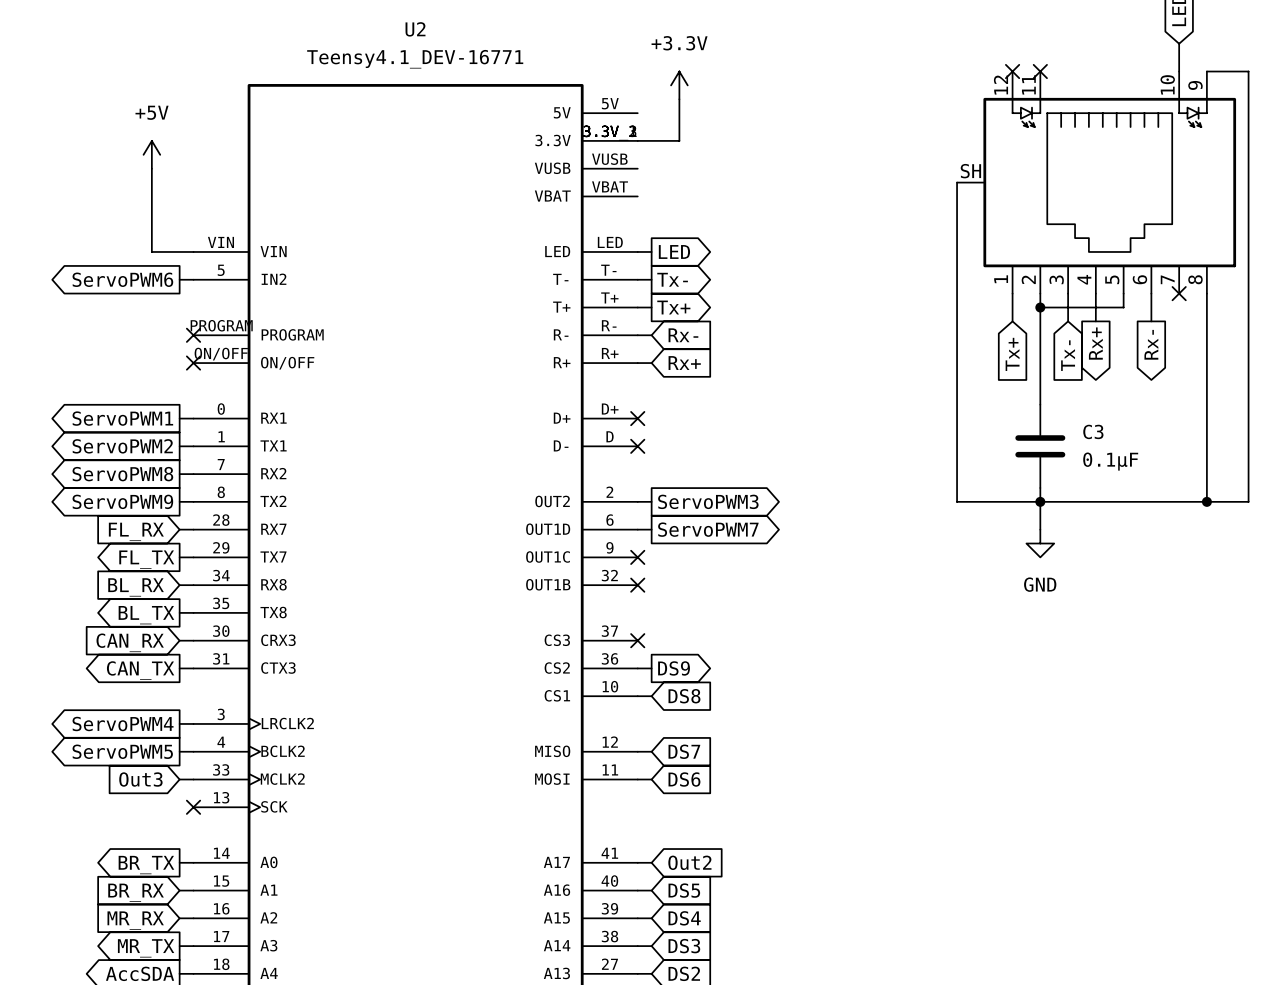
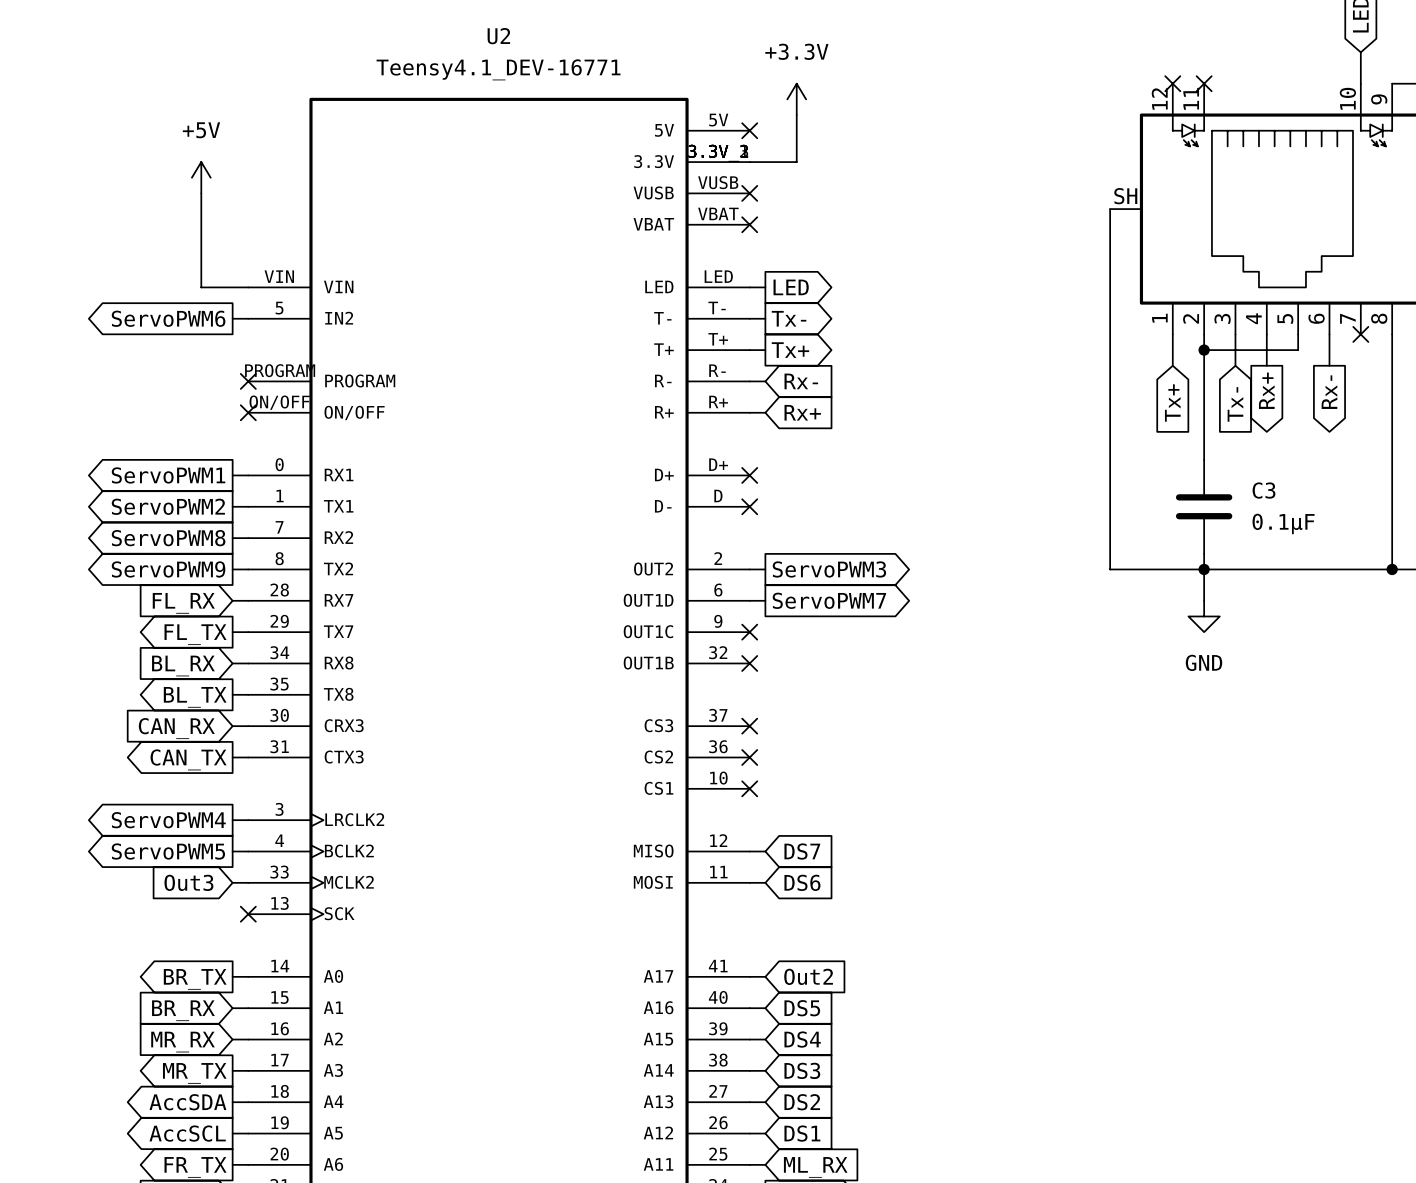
no-connect mark: none -> (749, 130)
no-connect mark: none -> (749, 193)
no-connect mark: none -> (749, 224)
wire: (637, 668) (651, 668) -> none
no-connect mark: none -> (749, 757)
global label: DS9 (674, 668) -> none
wire: (637, 696) (651, 696) -> none
no-connect mark: none -> (749, 788)
global label: DS8 (684, 696) -> none

